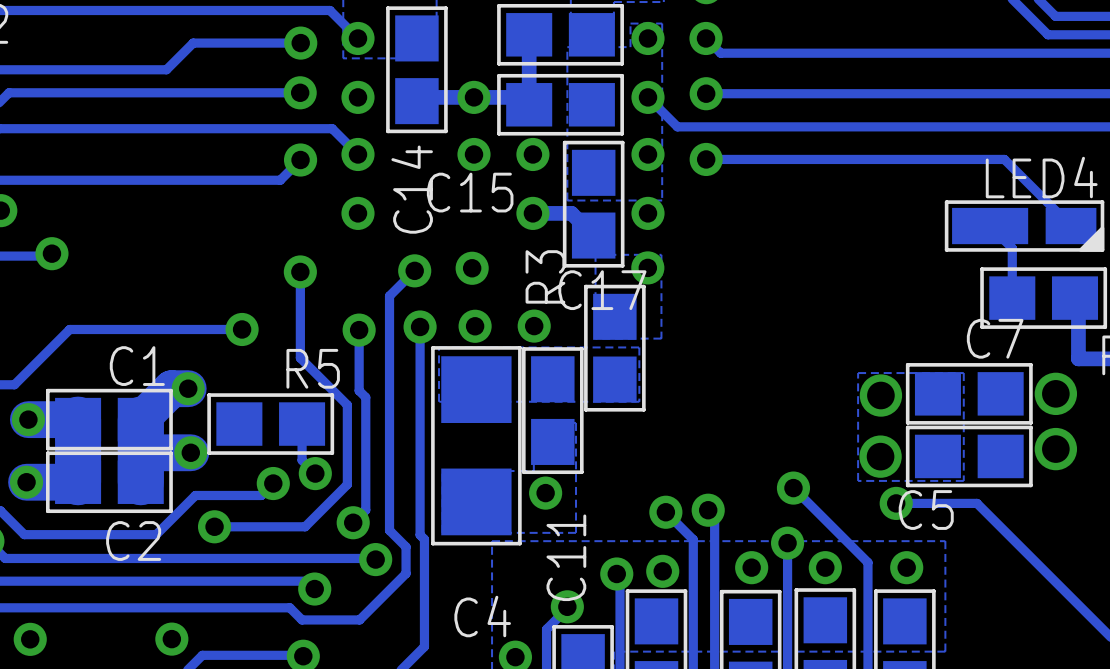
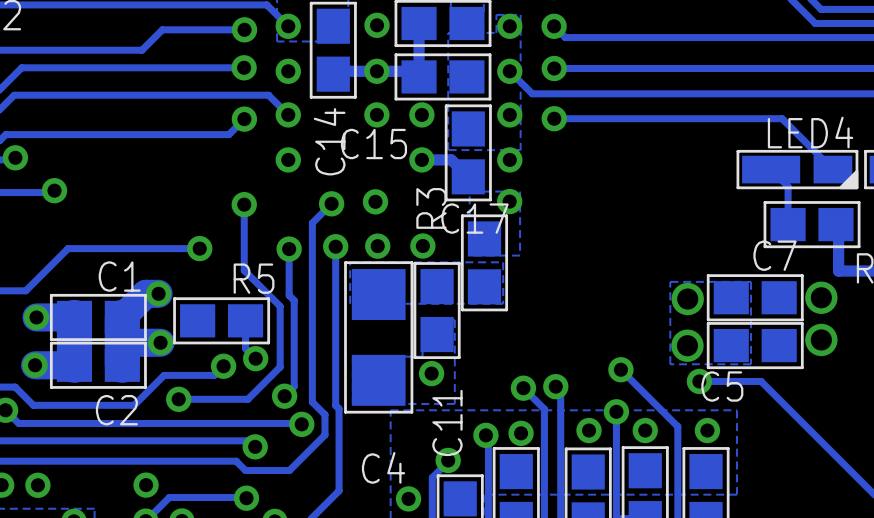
via: none -> (377, 25)

